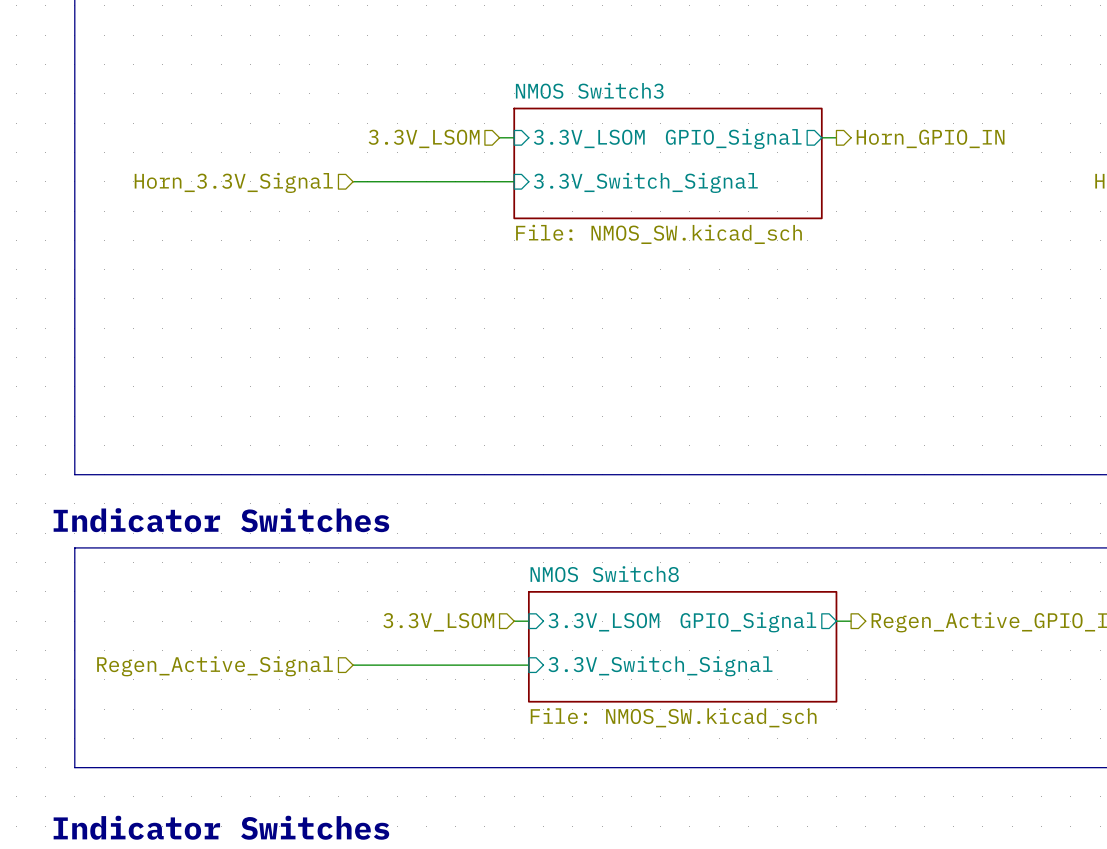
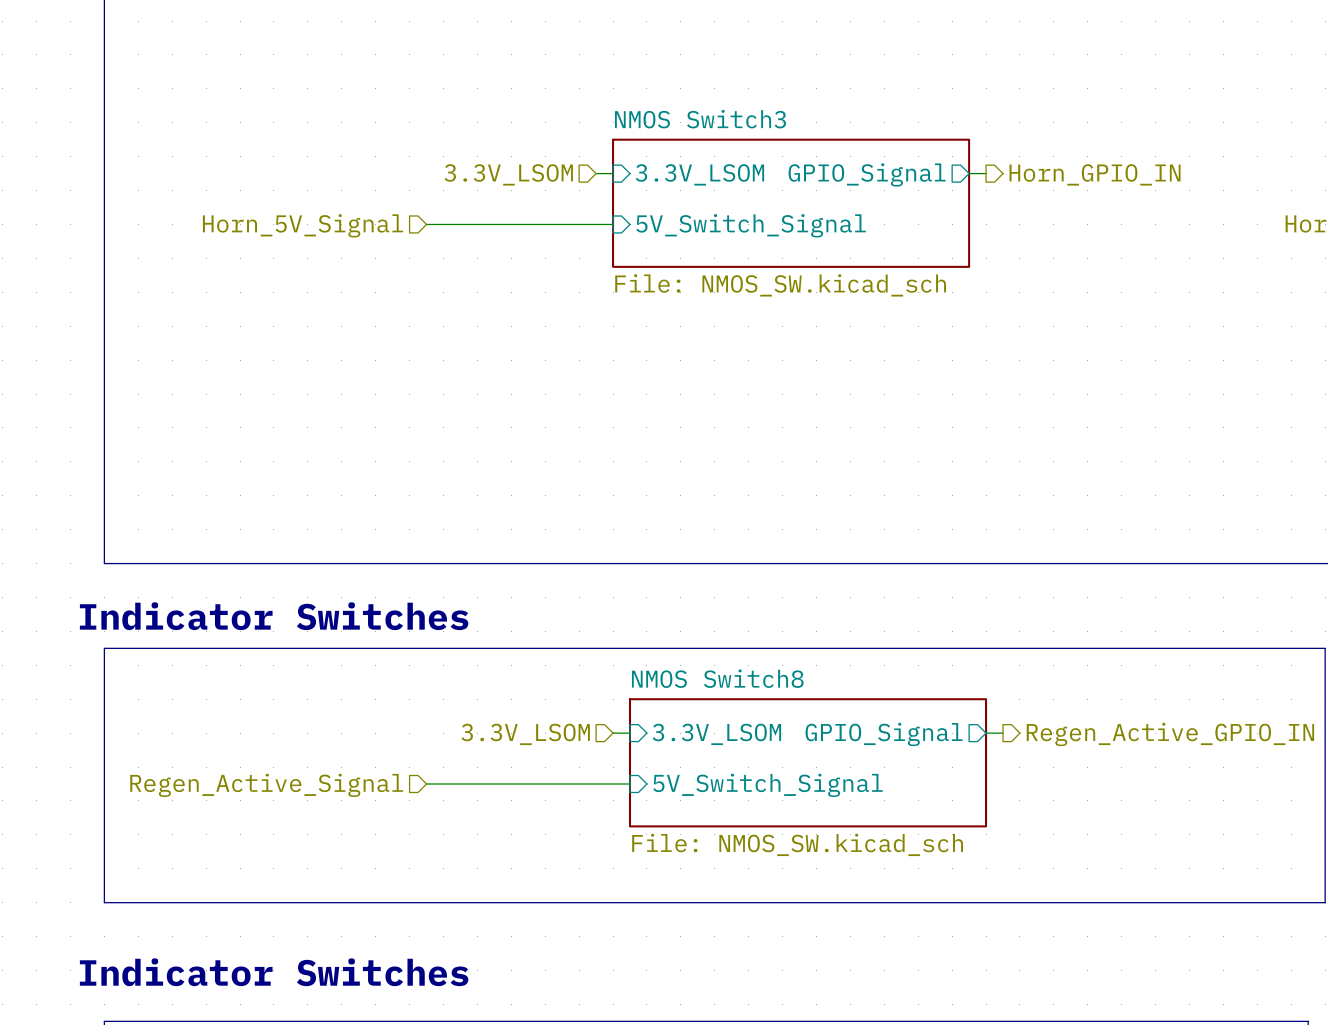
hierarchical label: Horn_3.3V_Signal (233, 182) -> Horn_5V_Signal (302, 225)
sheet pin: 3.3V_Switch_Signal (645, 182) -> 5V_Switch_Signal (751, 225)
sheet pin: 3.3V_Switch_Signal (660, 666) -> 5V_Switch_Signal (768, 785)

